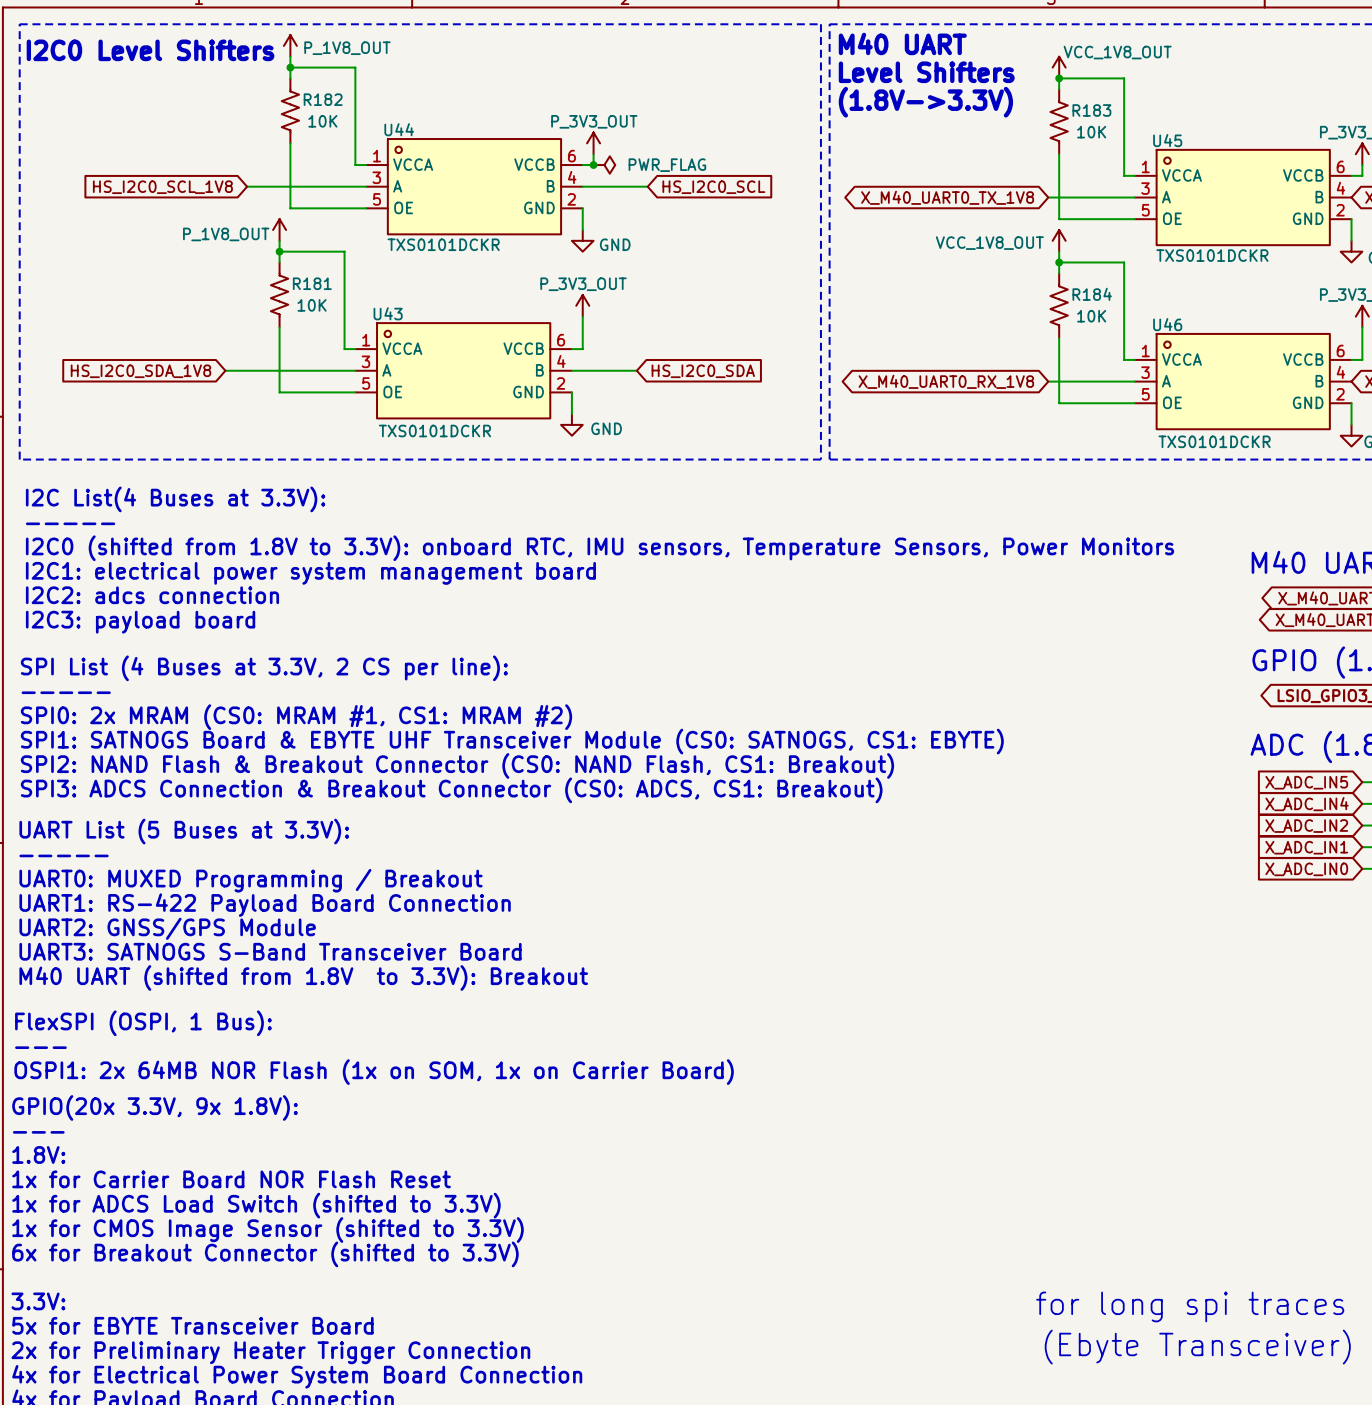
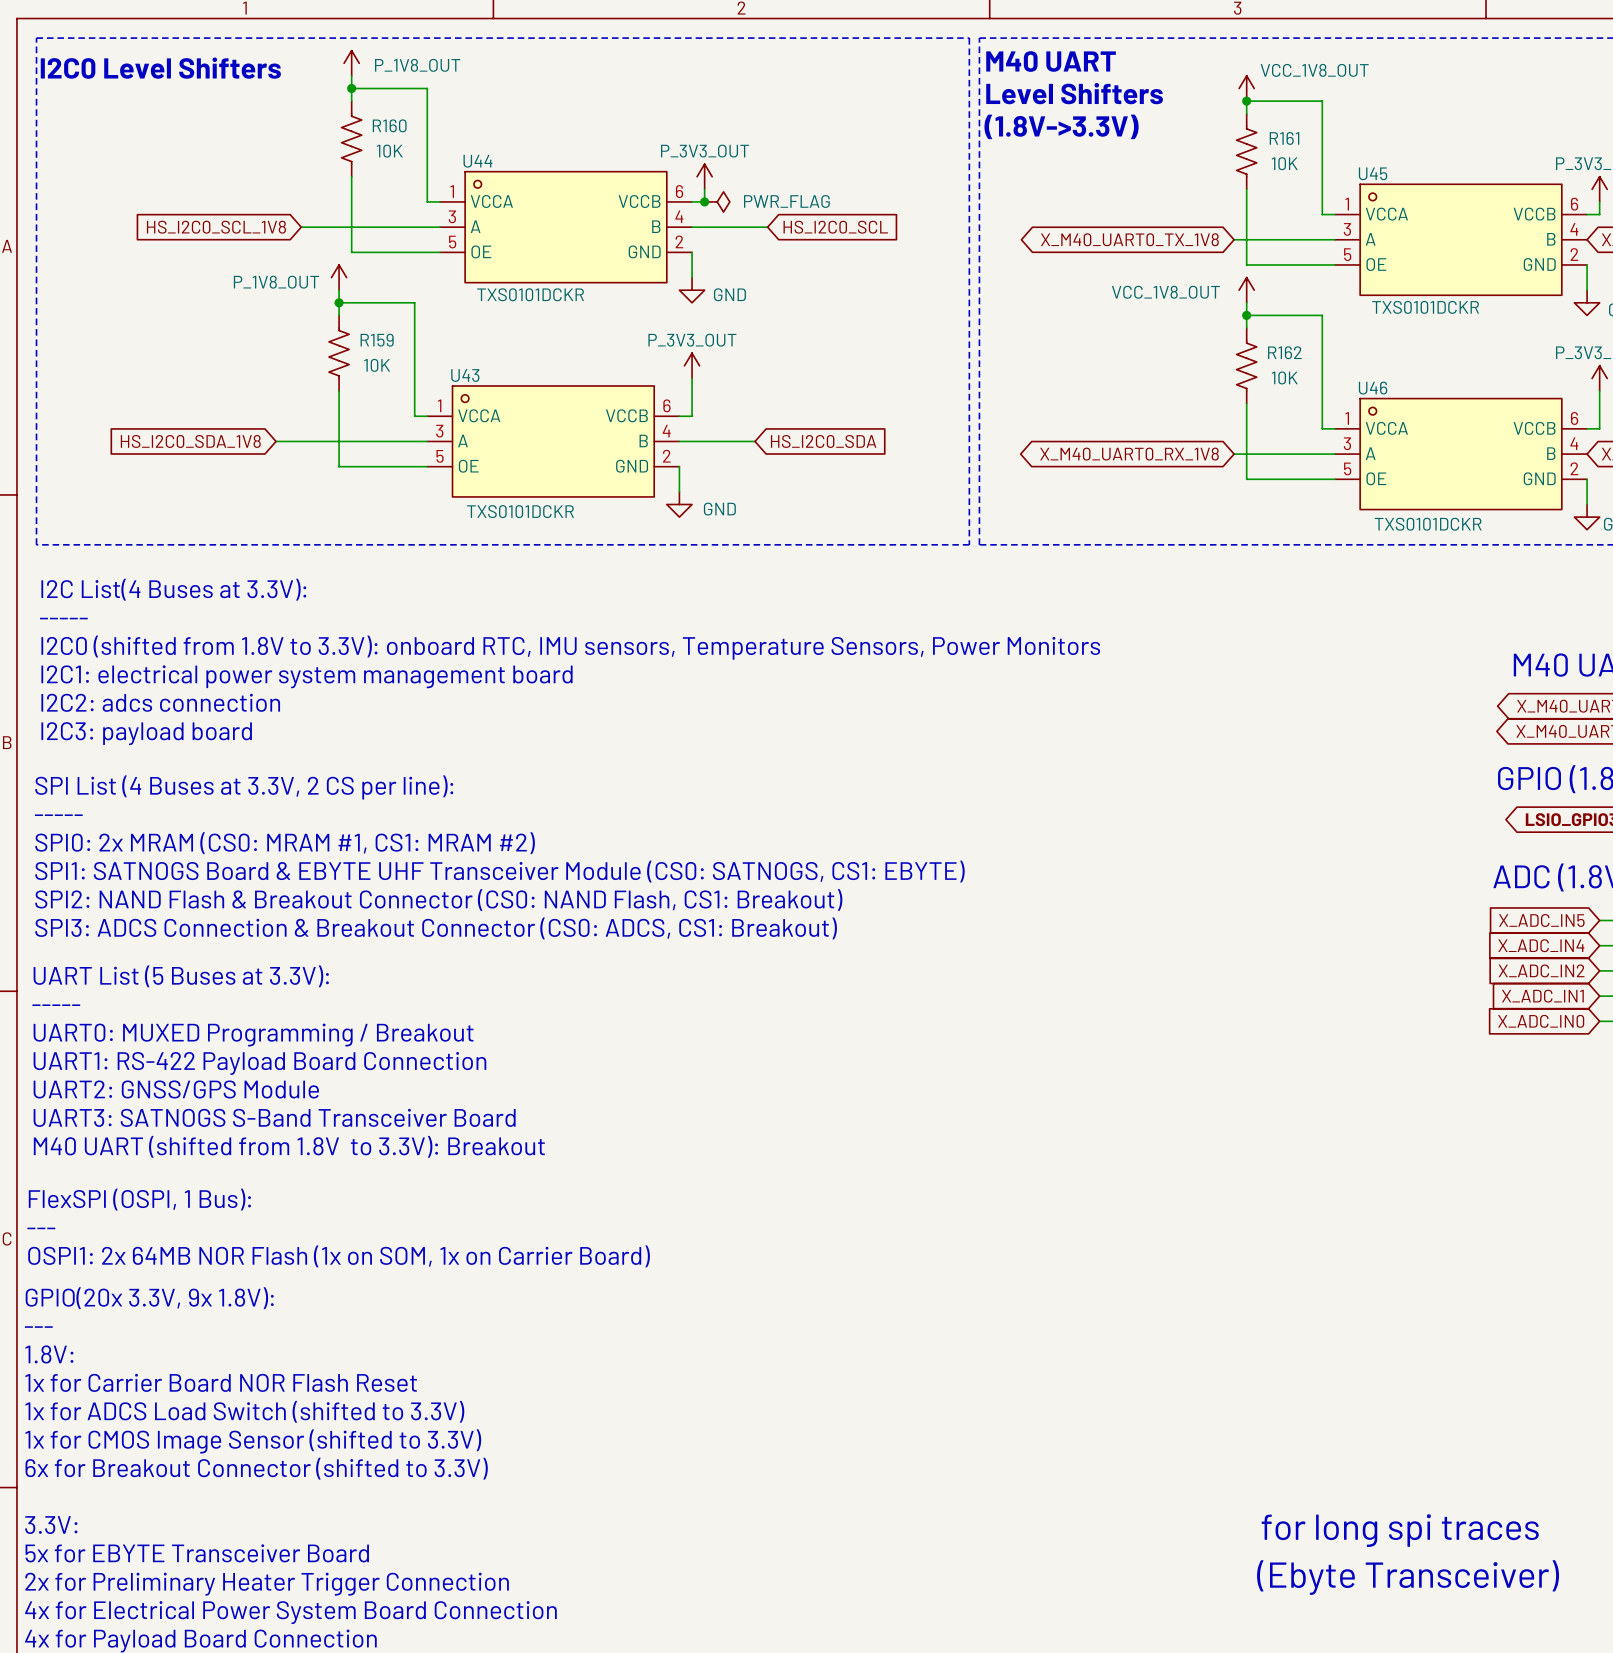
R182 name: R182 (323, 99) -> R160 (389, 125)
R183 name: R183 (1091, 110) -> R161 (1284, 138)
R181 name: R181 (312, 283) -> R159 (377, 340)
R184 name: R184 (1092, 294) -> R162 (1284, 352)

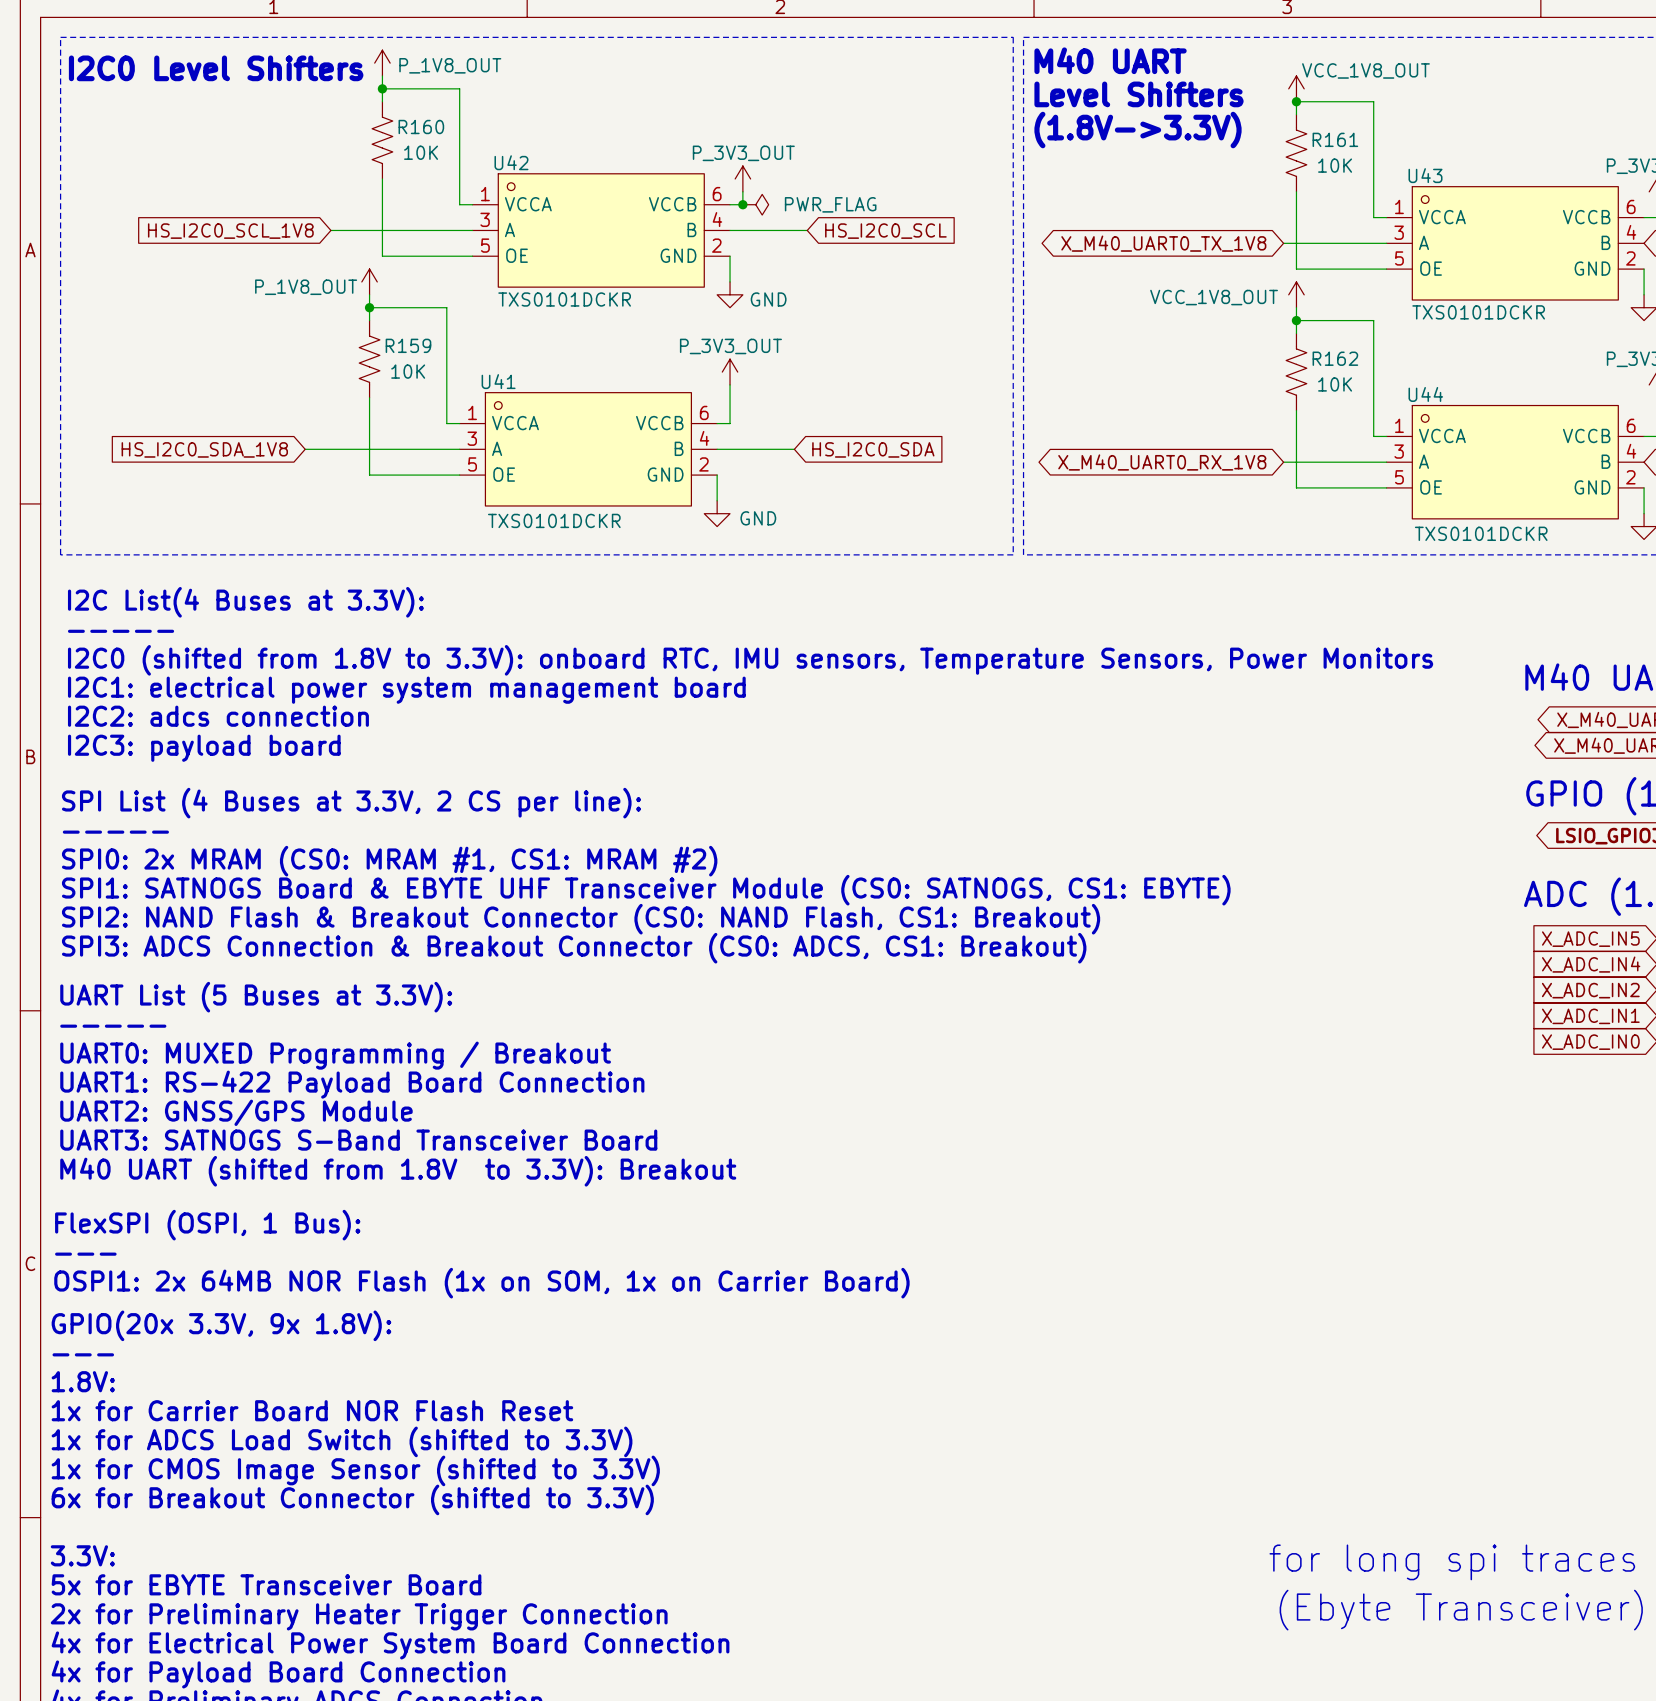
U44 name: U44 (477, 161) -> U42 (511, 162)
U45 name: U45 (1373, 173) -> U43 (1425, 175)
U43 name: U43 (465, 375) -> U41 (498, 381)
U46 name: U46 (1373, 388) -> U44 (1425, 394)

